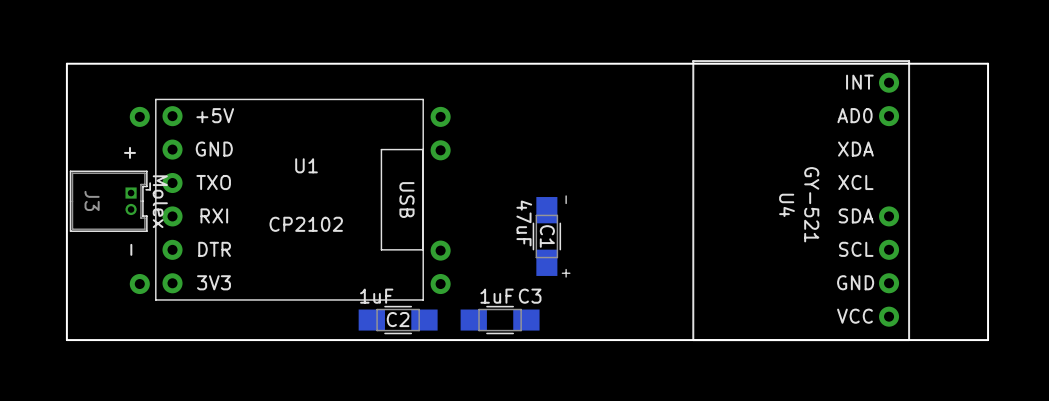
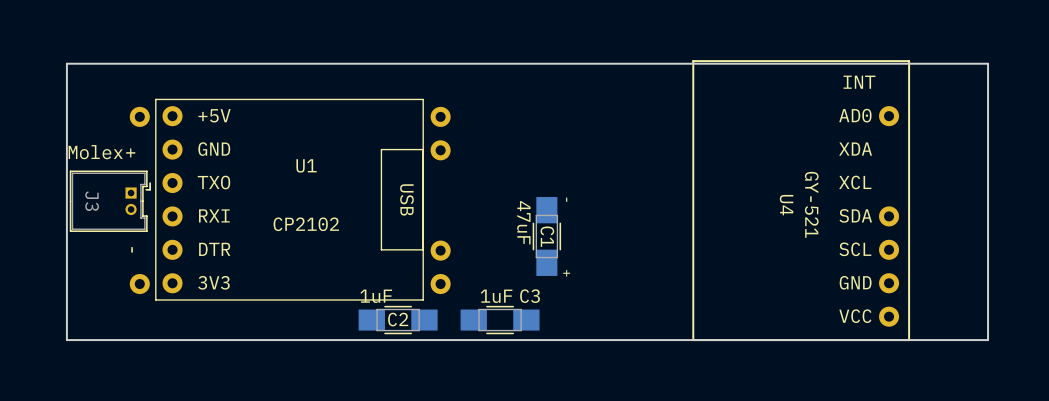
U4 footprint: [692, 60, 911, 342] -> [692, 60, 911, 342]
J3 value rotation: 0° (160, 201) -> 90° counterclockwise (95, 152)
J3 value position: Molex (160, 201) -> Molex (95, 152)

